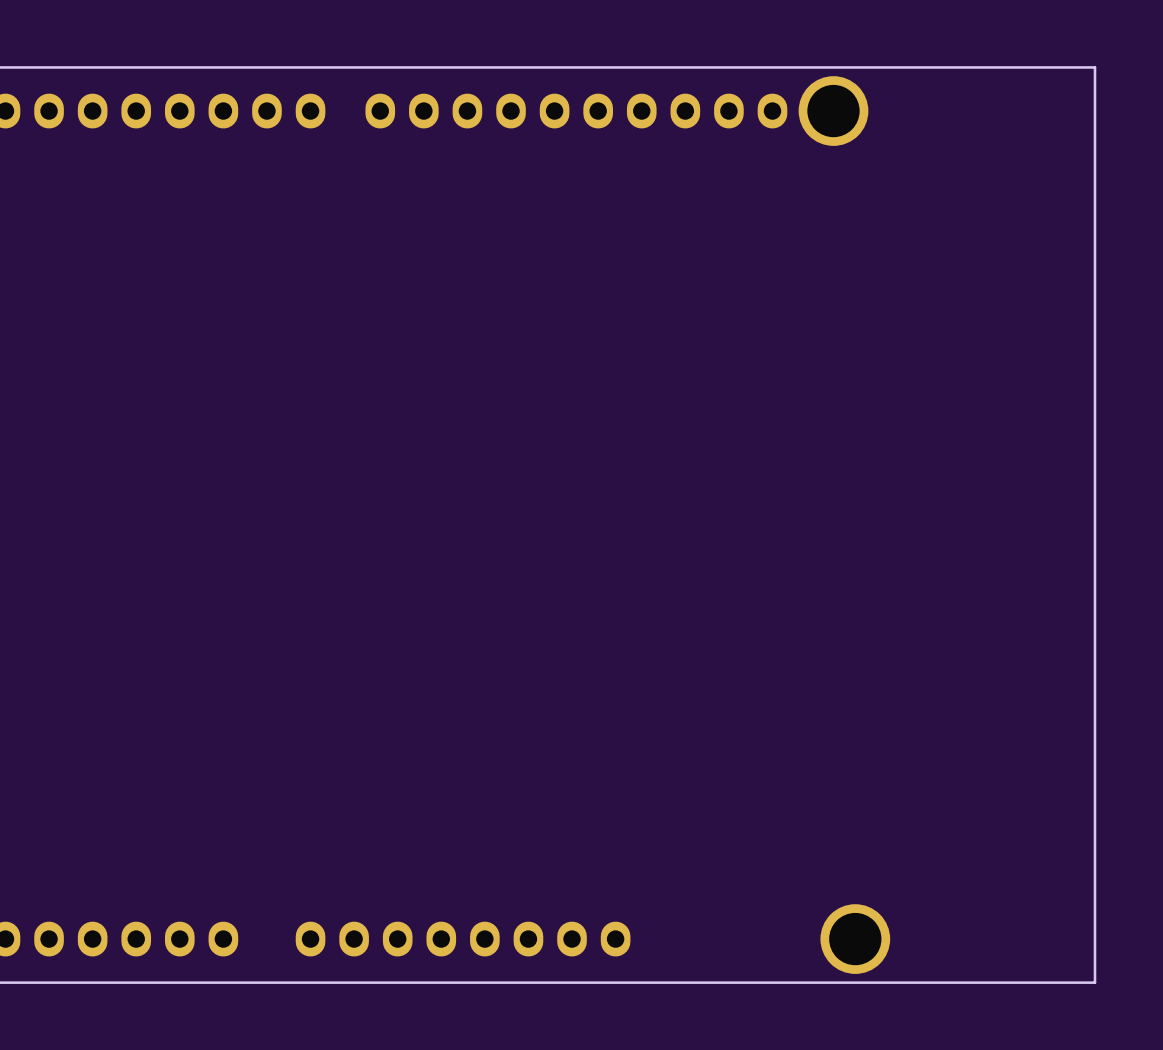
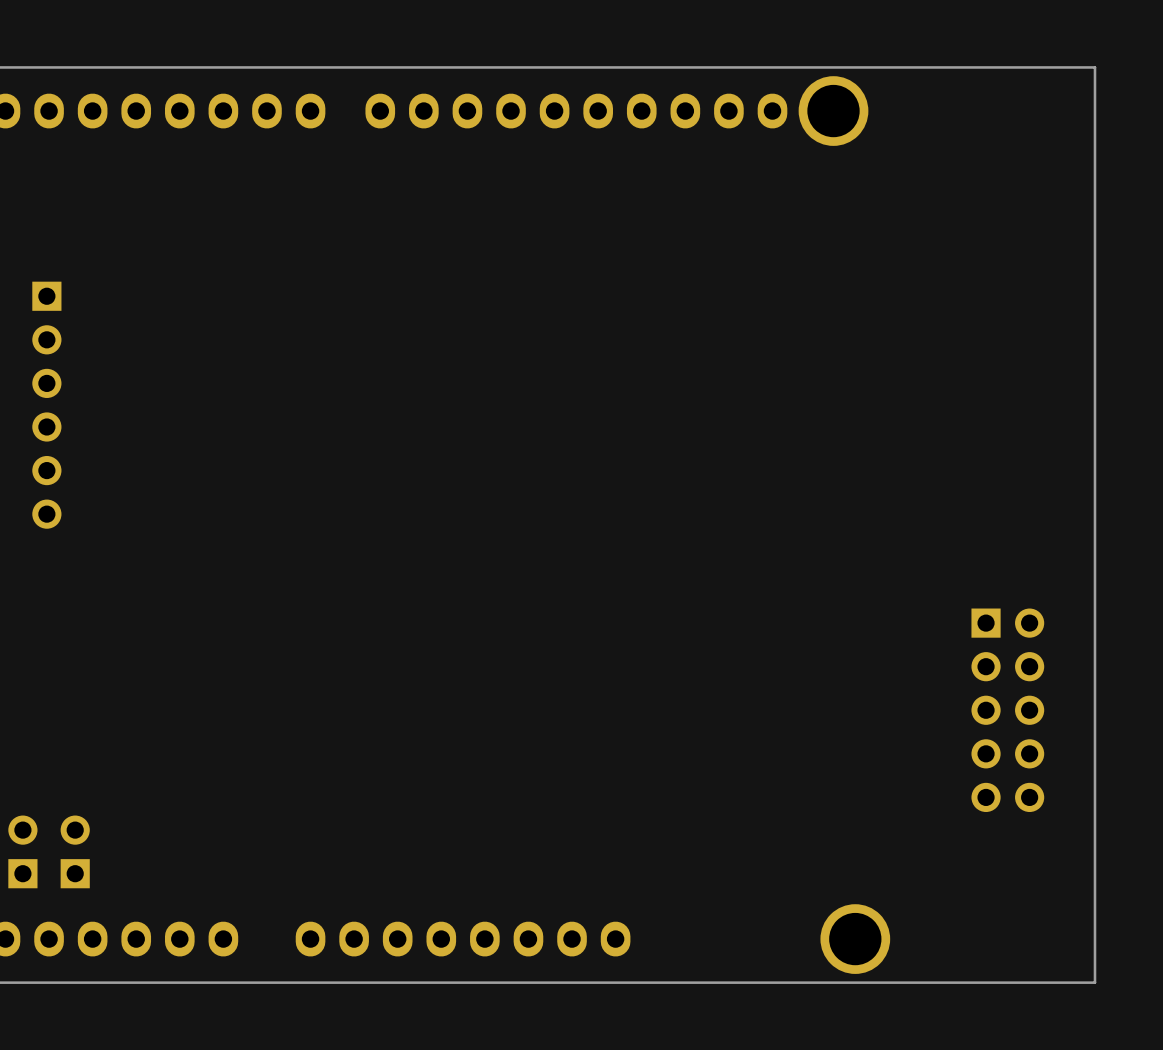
part: none -> (46, 405)
part: none -> (1007, 710)
part: none -> (22, 851)
part: none -> (75, 851)

